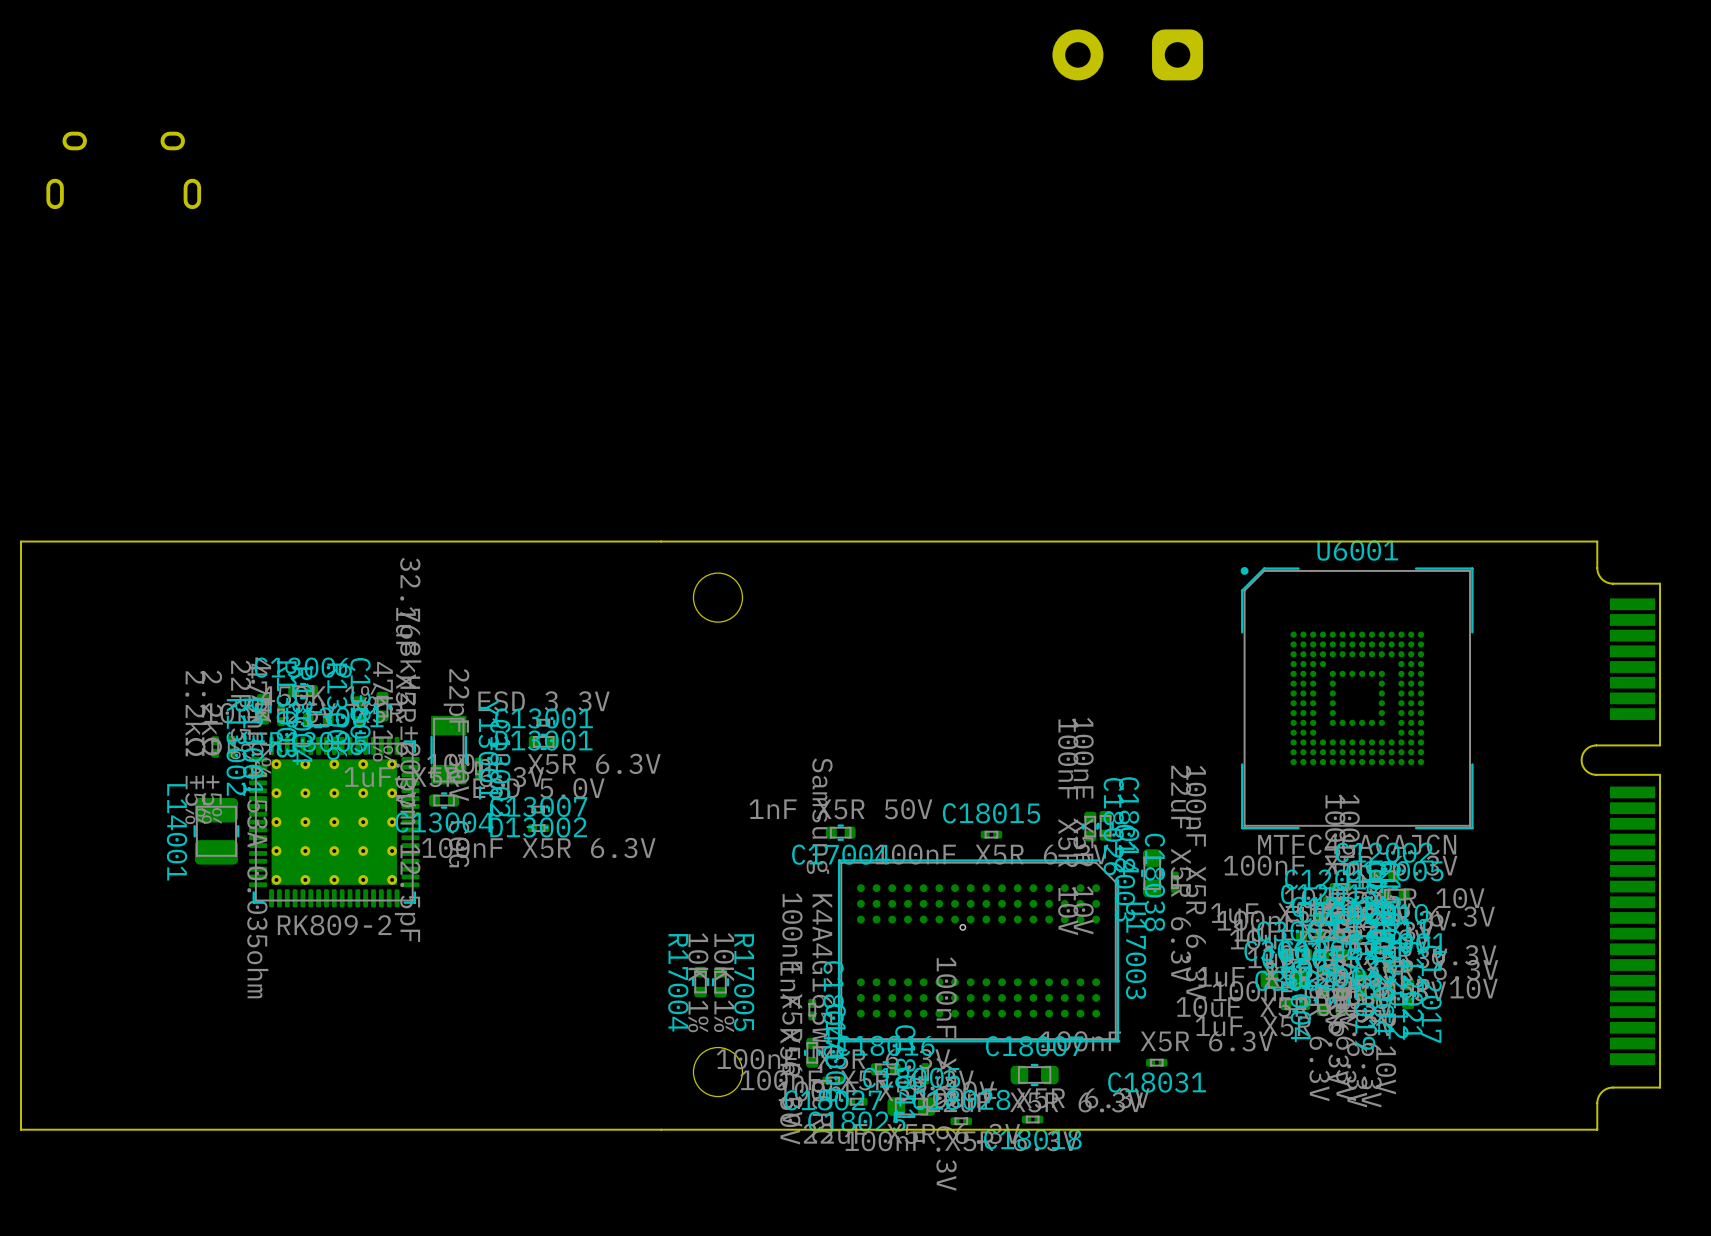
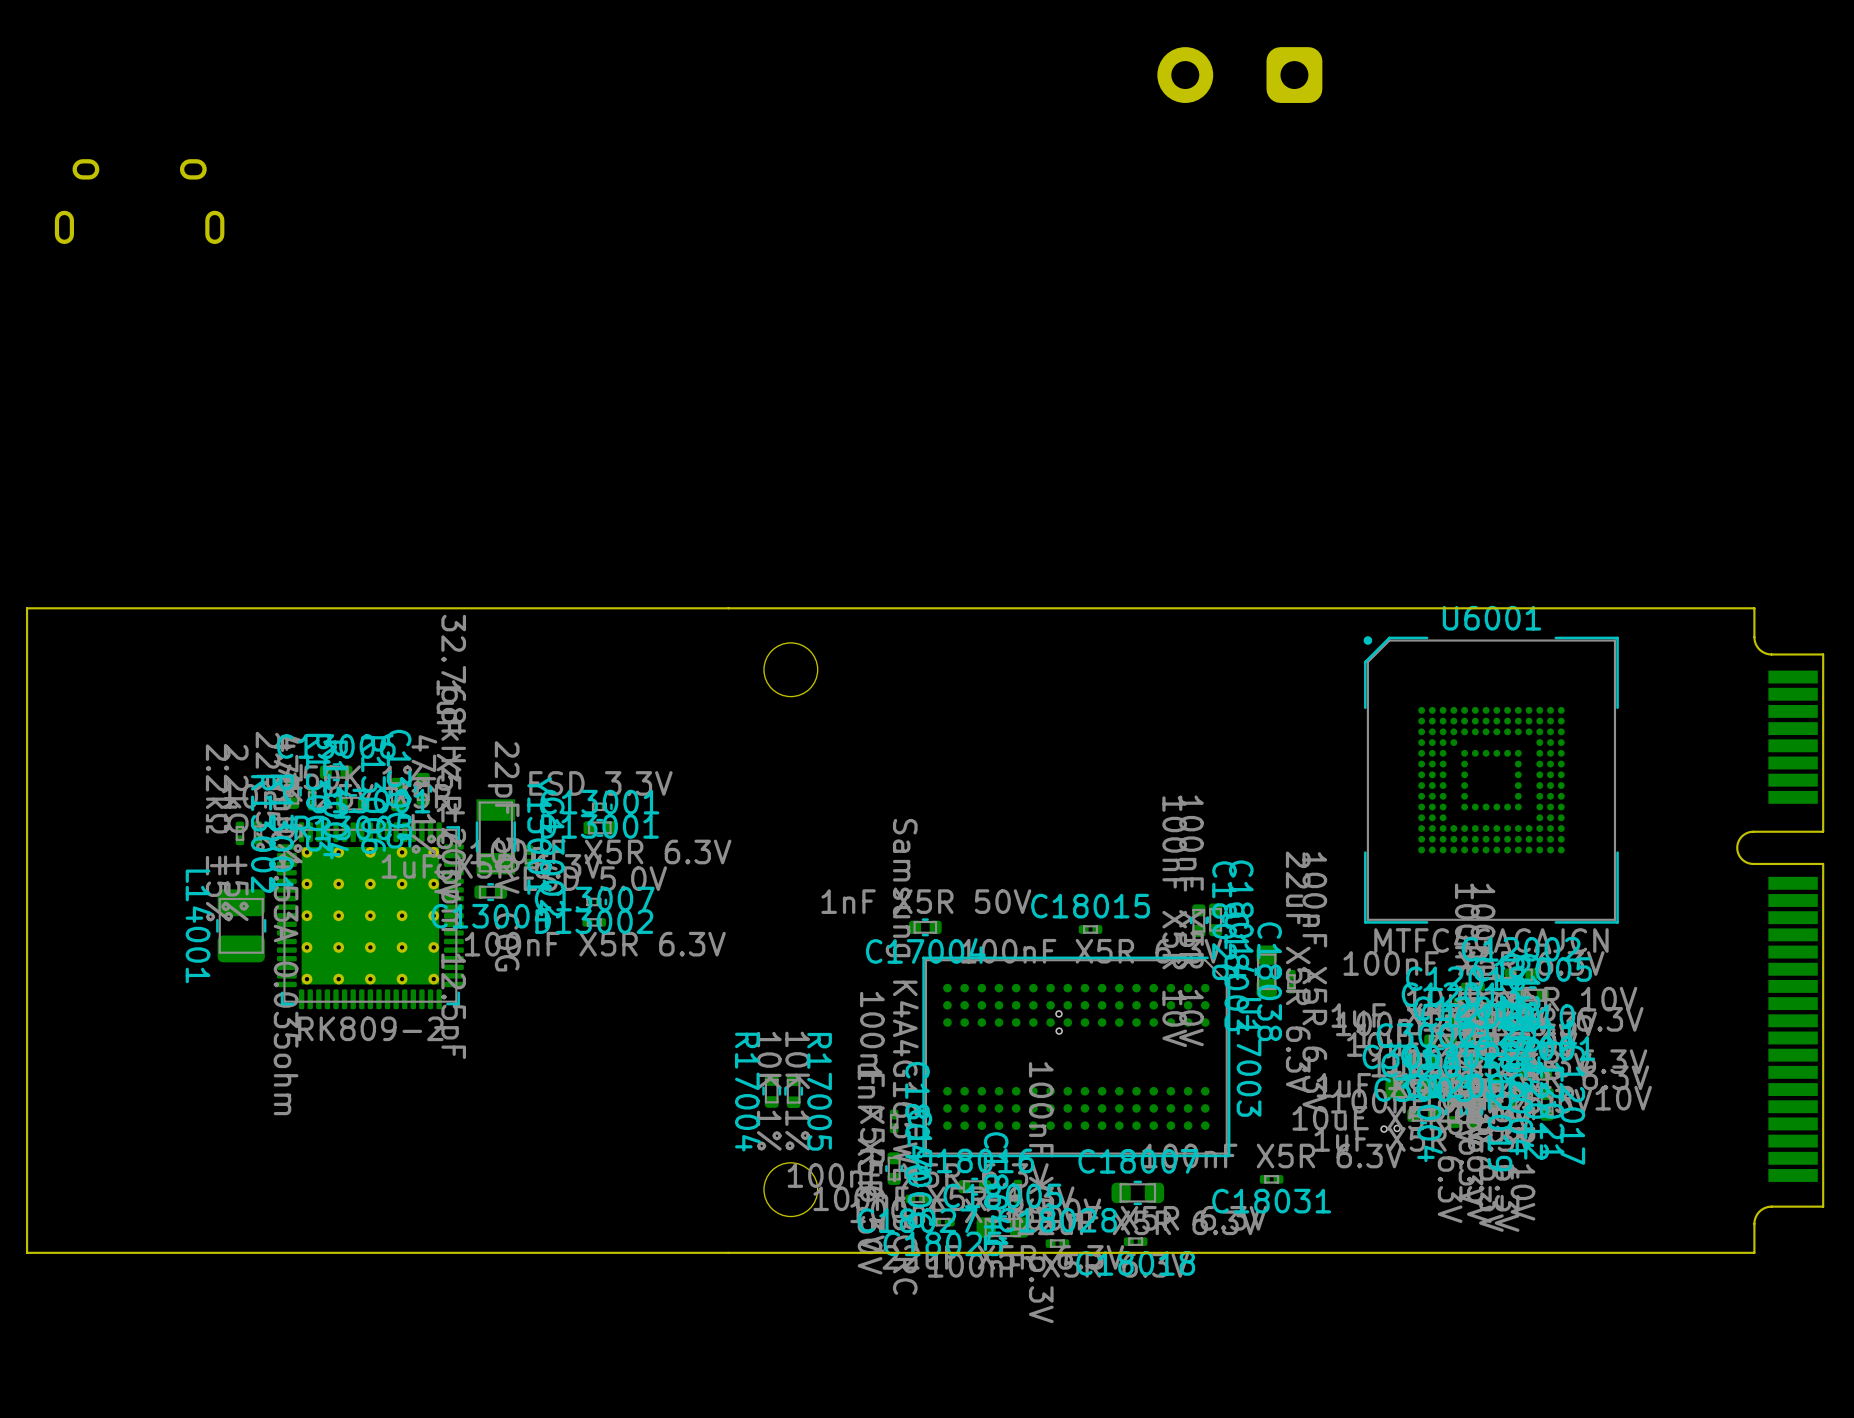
via: none -> (1058, 1013)
via: none -> (1384, 1129)
via: none -> (1397, 1128)

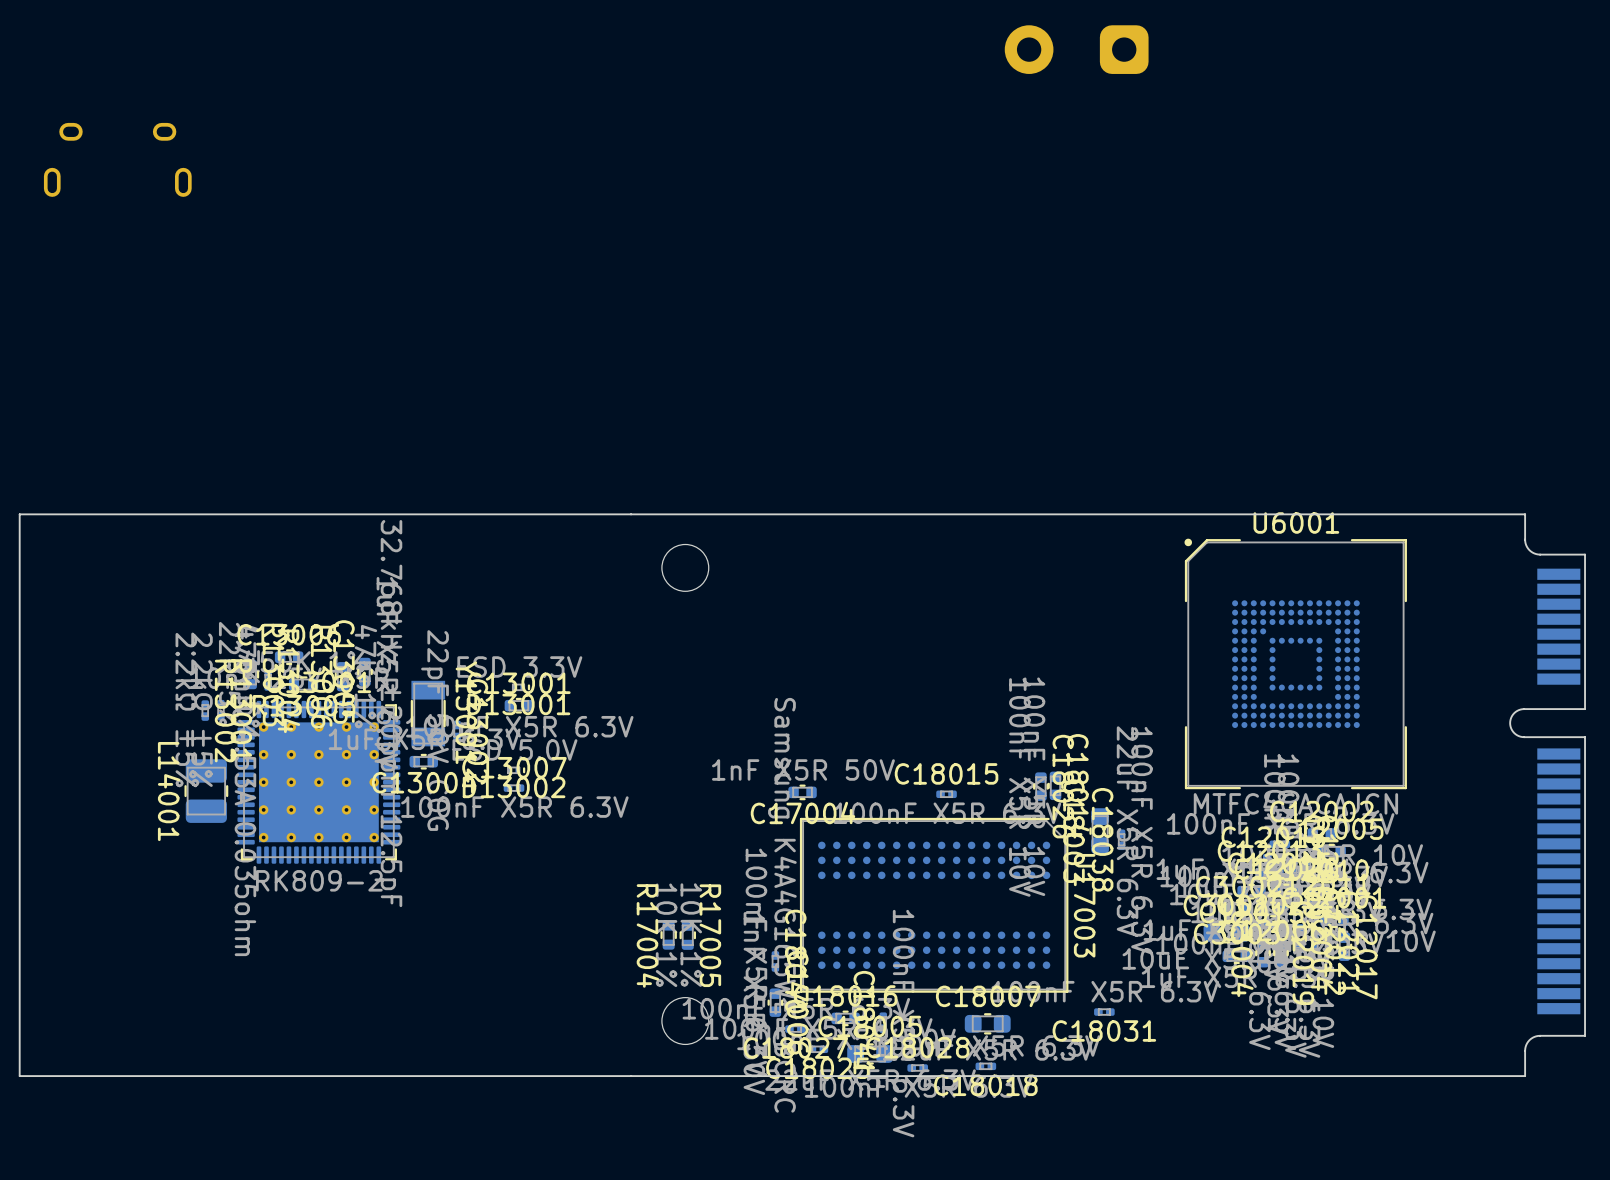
via: (1058, 1013) -> none
via: (1059, 1031) -> none
via: (1397, 1128) -> none
via: (1384, 1129) -> none

